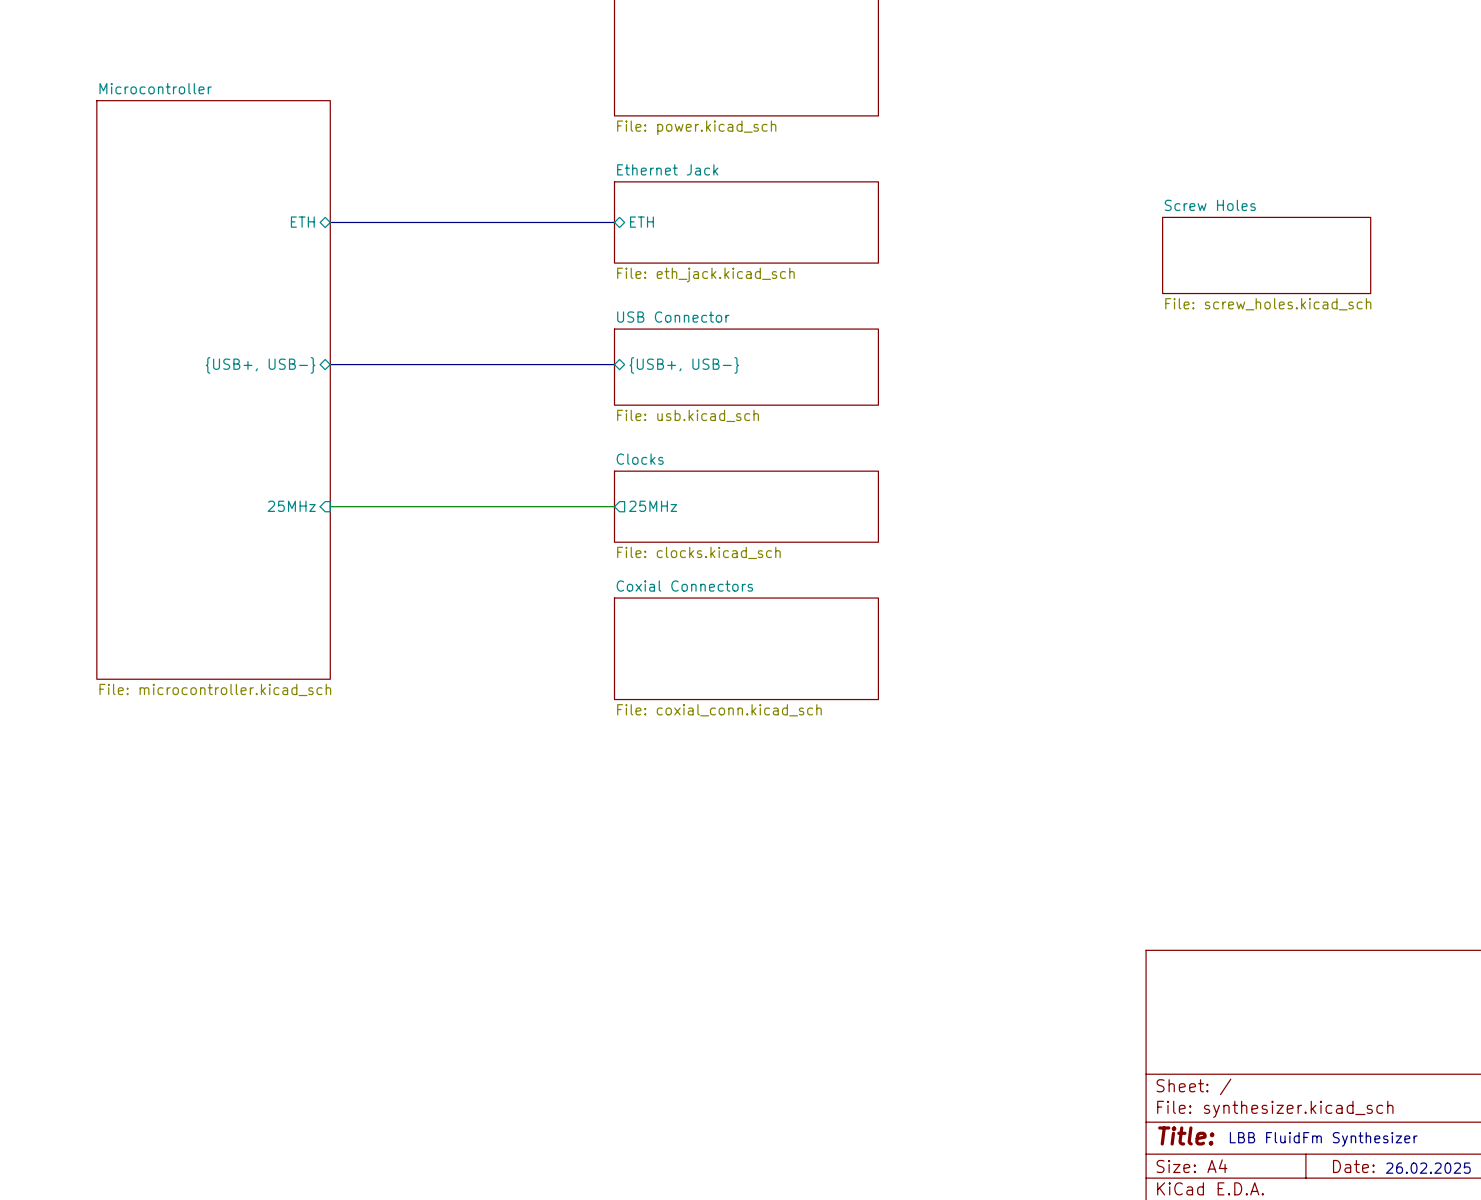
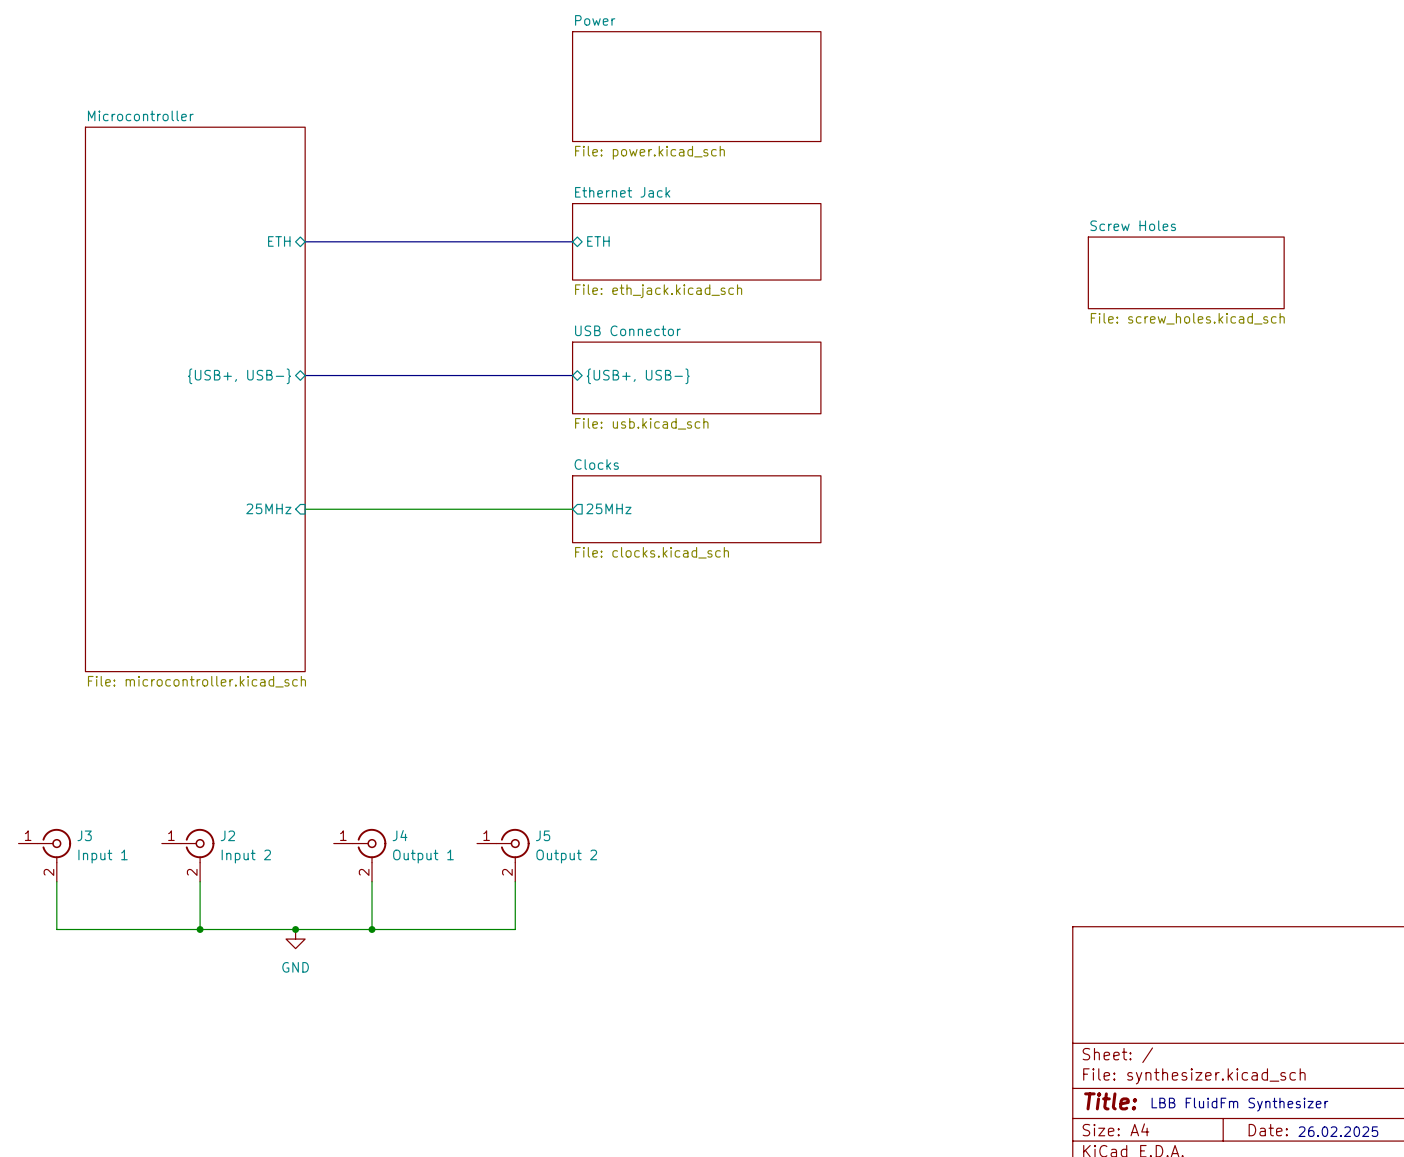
sheet Coxial Connectors: File: coxial_conn.kicad_sch (746, 648) -> none
J3: none -> Input 1 (44, 855)
J2: none -> Input 2 (188, 855)
J4: none -> Output 1 (360, 855)
J5: none -> Output 2 (503, 855)
wire: none -> (56, 881) (56, 929) (515, 929) (515, 881)
wire: none -> (200, 881) (200, 929)
wire: none -> (372, 881) (372, 929)
junction: none -> (200, 929)
junction: none -> (295, 929)
junction: none -> (372, 929)
power symbol: none -> GND (295, 939)

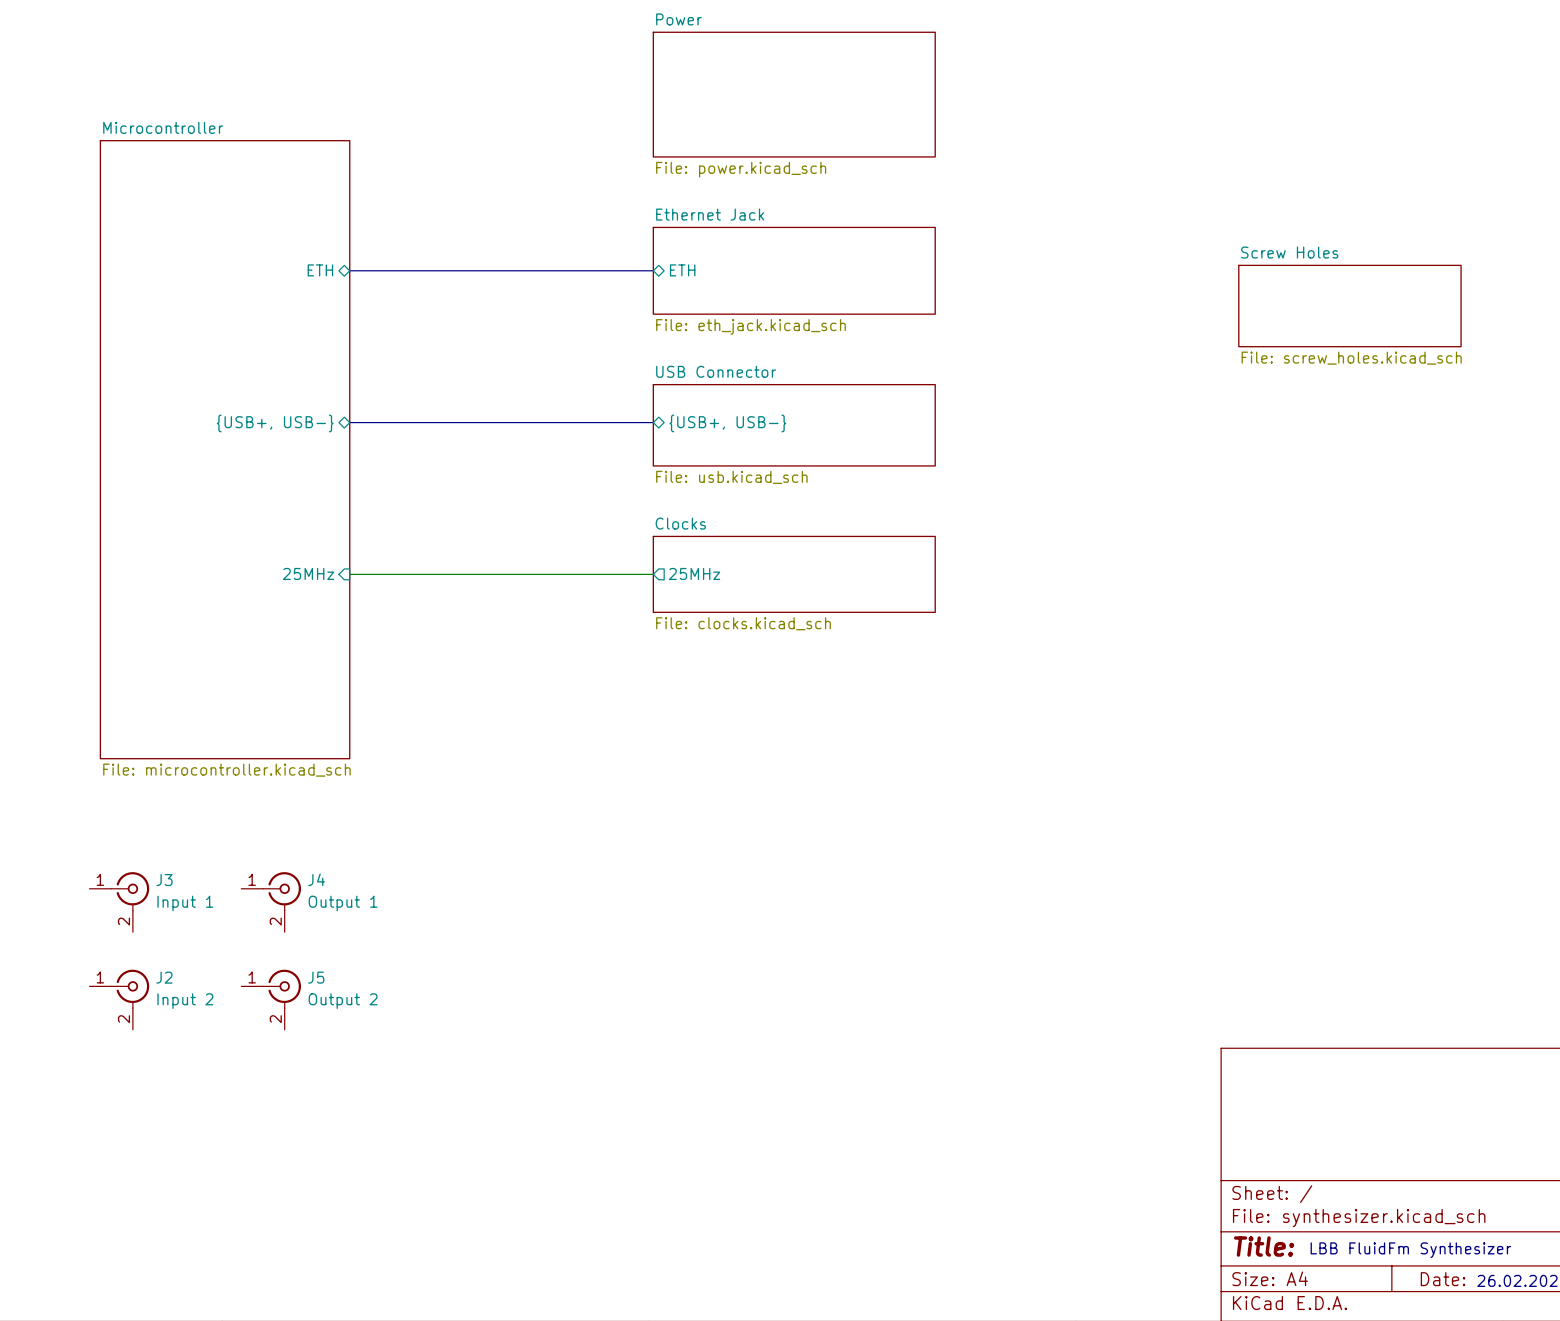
J3 position: (44, 855) -> (119, 902)
J2 position: (188, 855) -> (119, 999)
J4 position: (360, 855) -> (271, 902)
J5 position: (503, 855) -> (271, 999)
wire: (56, 881) (56, 929) (515, 929) (515, 881) -> none
wire: (200, 881) (200, 929) -> none
wire: (372, 881) (372, 929) -> none
junction: (200, 929) -> none
junction: (295, 929) -> none
junction: (372, 929) -> none
power symbol: GND (295, 939) -> none

